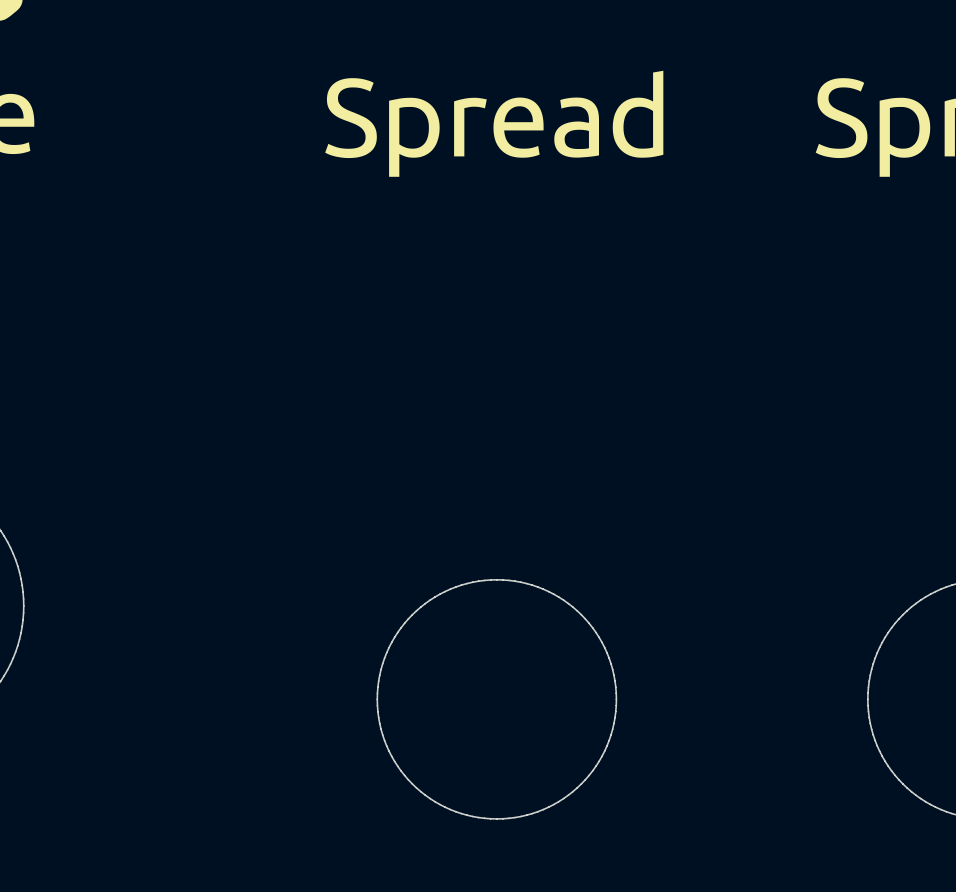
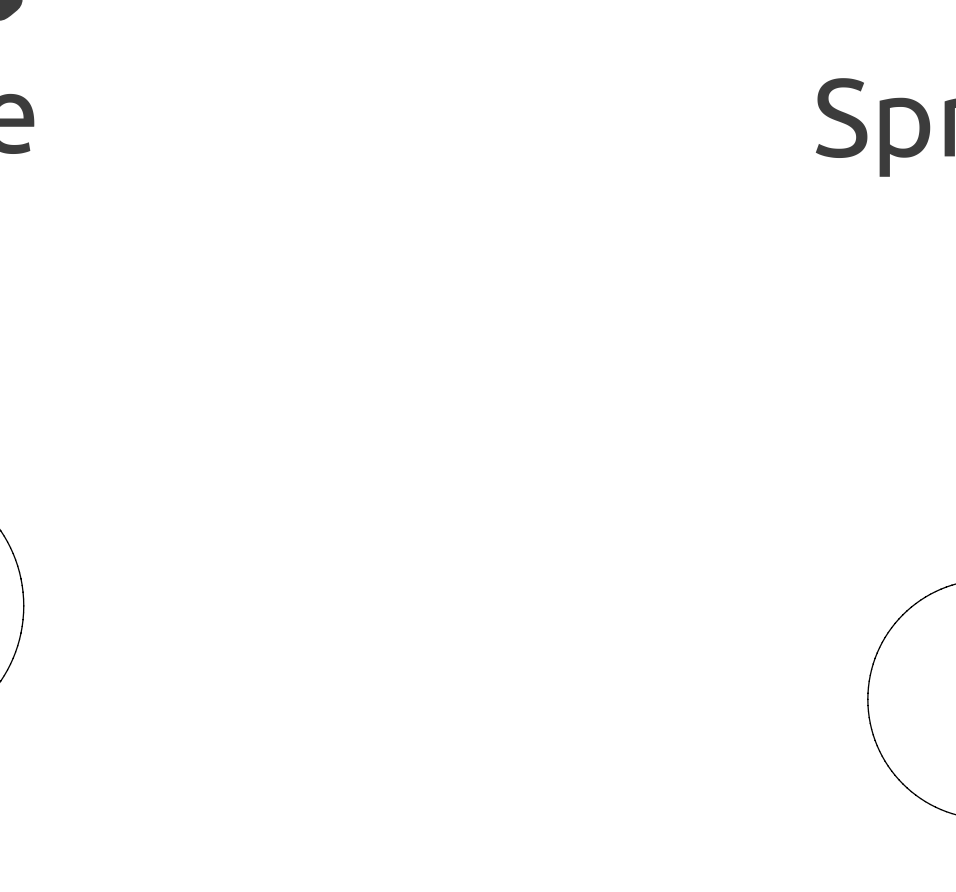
drawing: [325, 70, 664, 177] -> none
board edge: (490, 579) (466, 583) (445, 591) (425, 603) (408, 618) (394, 637) (384, 658) (378, 681) (377, 705) (381, 729) (389, 751) (401, 770) (416, 787) (434, 801) (455, 811) (478, 817) (503, 818) (526, 815) (548, 807) (568, 795) (585, 779) (599, 761) (609, 740) (615, 717) (616, 693) (612, 669) (604, 647) (592, 627) (577, 610) (558, 597) (537, 587) (515, 581) (490, 579) -> none

